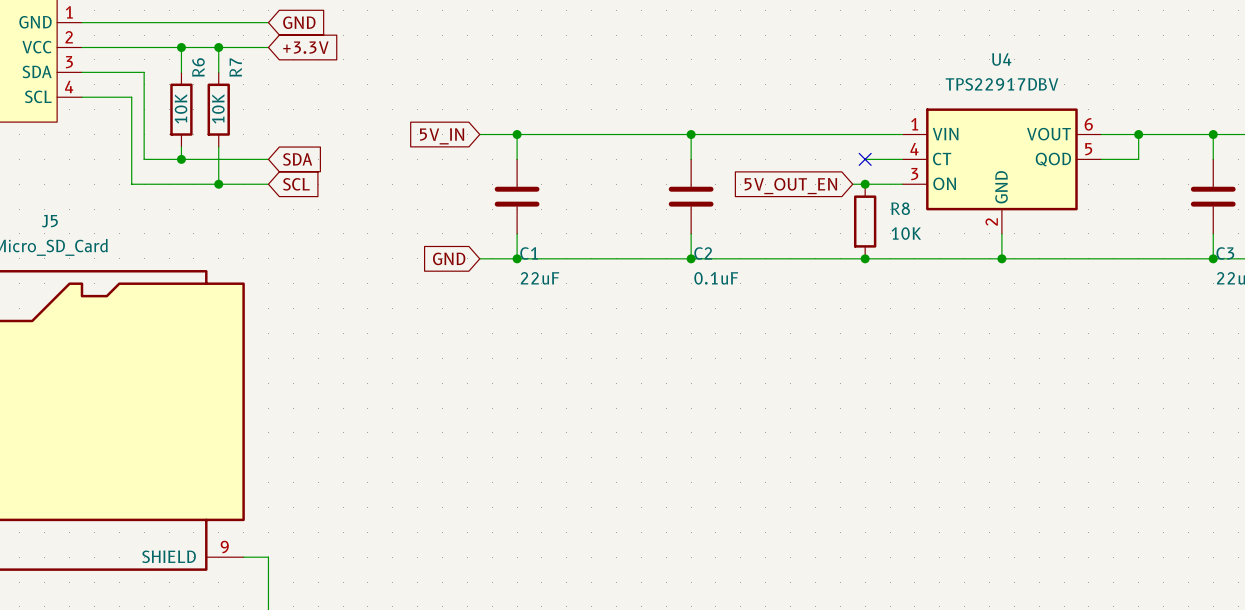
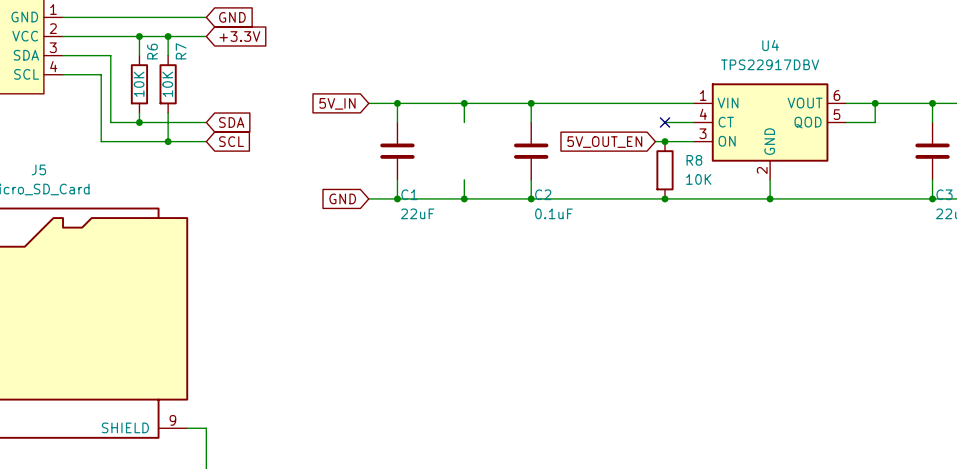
wire: none -> (464, 103) (464, 122)
junction: none -> (464, 103)
wire: none -> (464, 179) (464, 198)
junction: none -> (464, 198)

